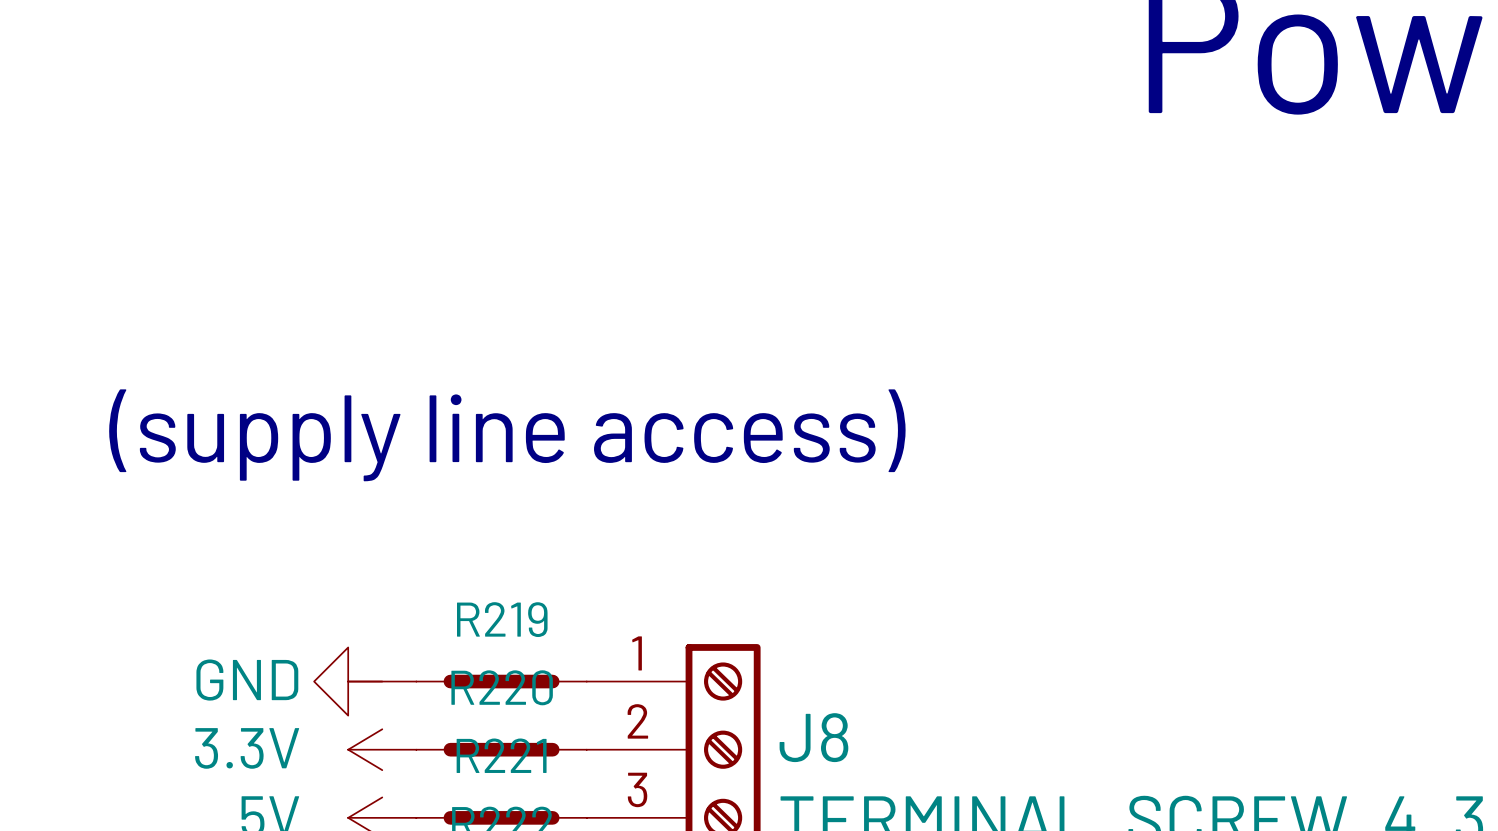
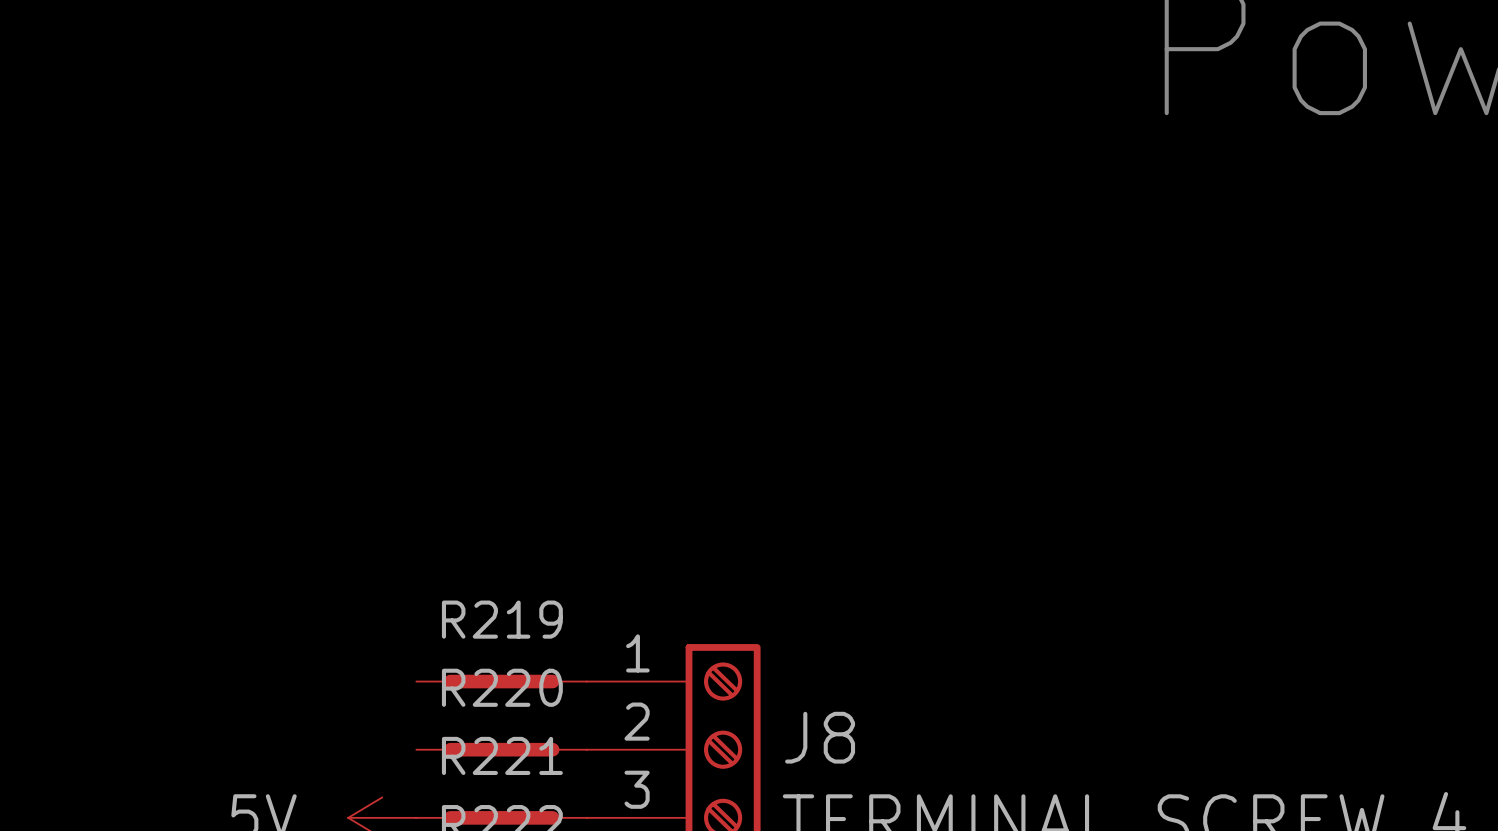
text: (supply line access) (507, 435) -> none
power symbol: GND (365, 681) -> none
power symbol: 3.3V (382, 749) -> none

